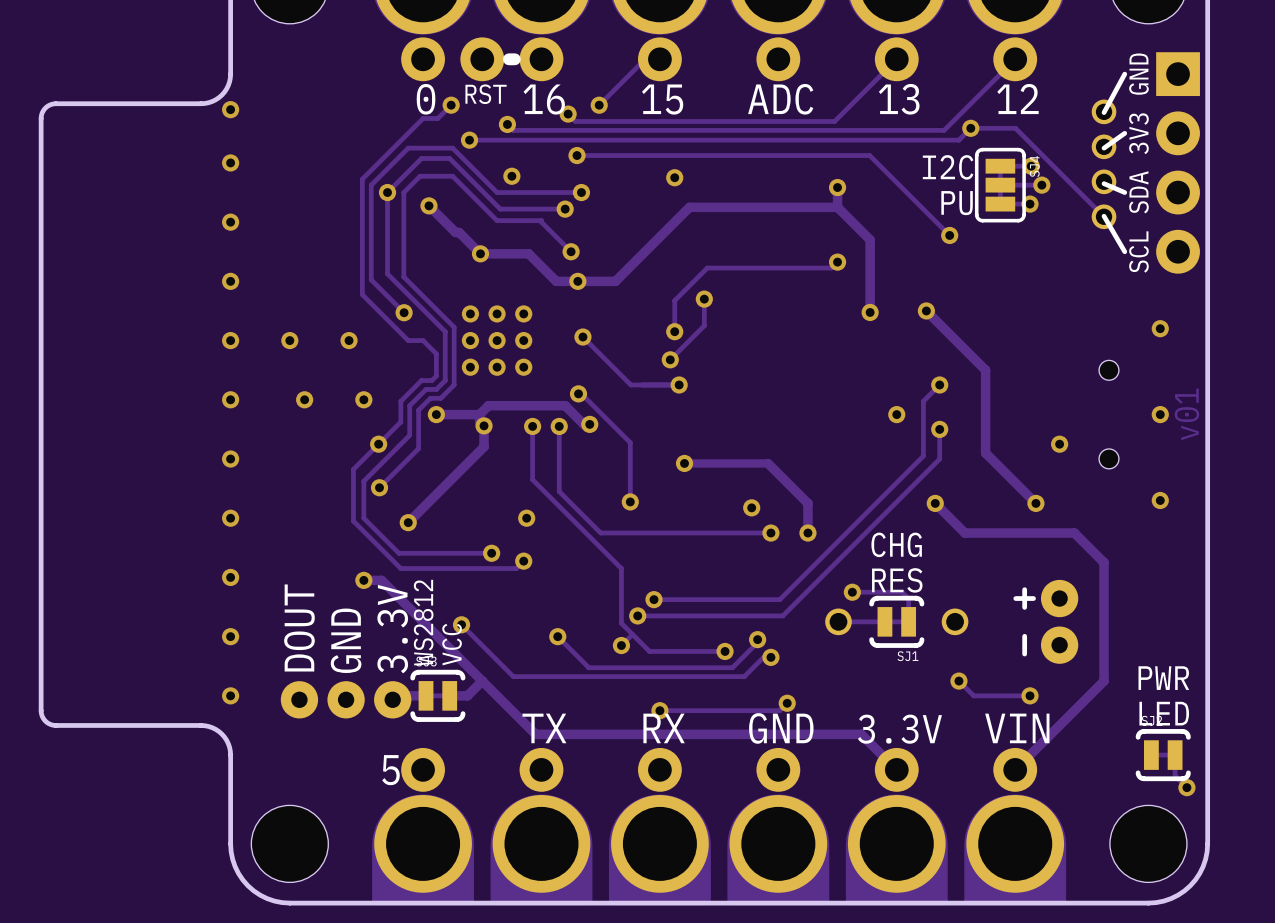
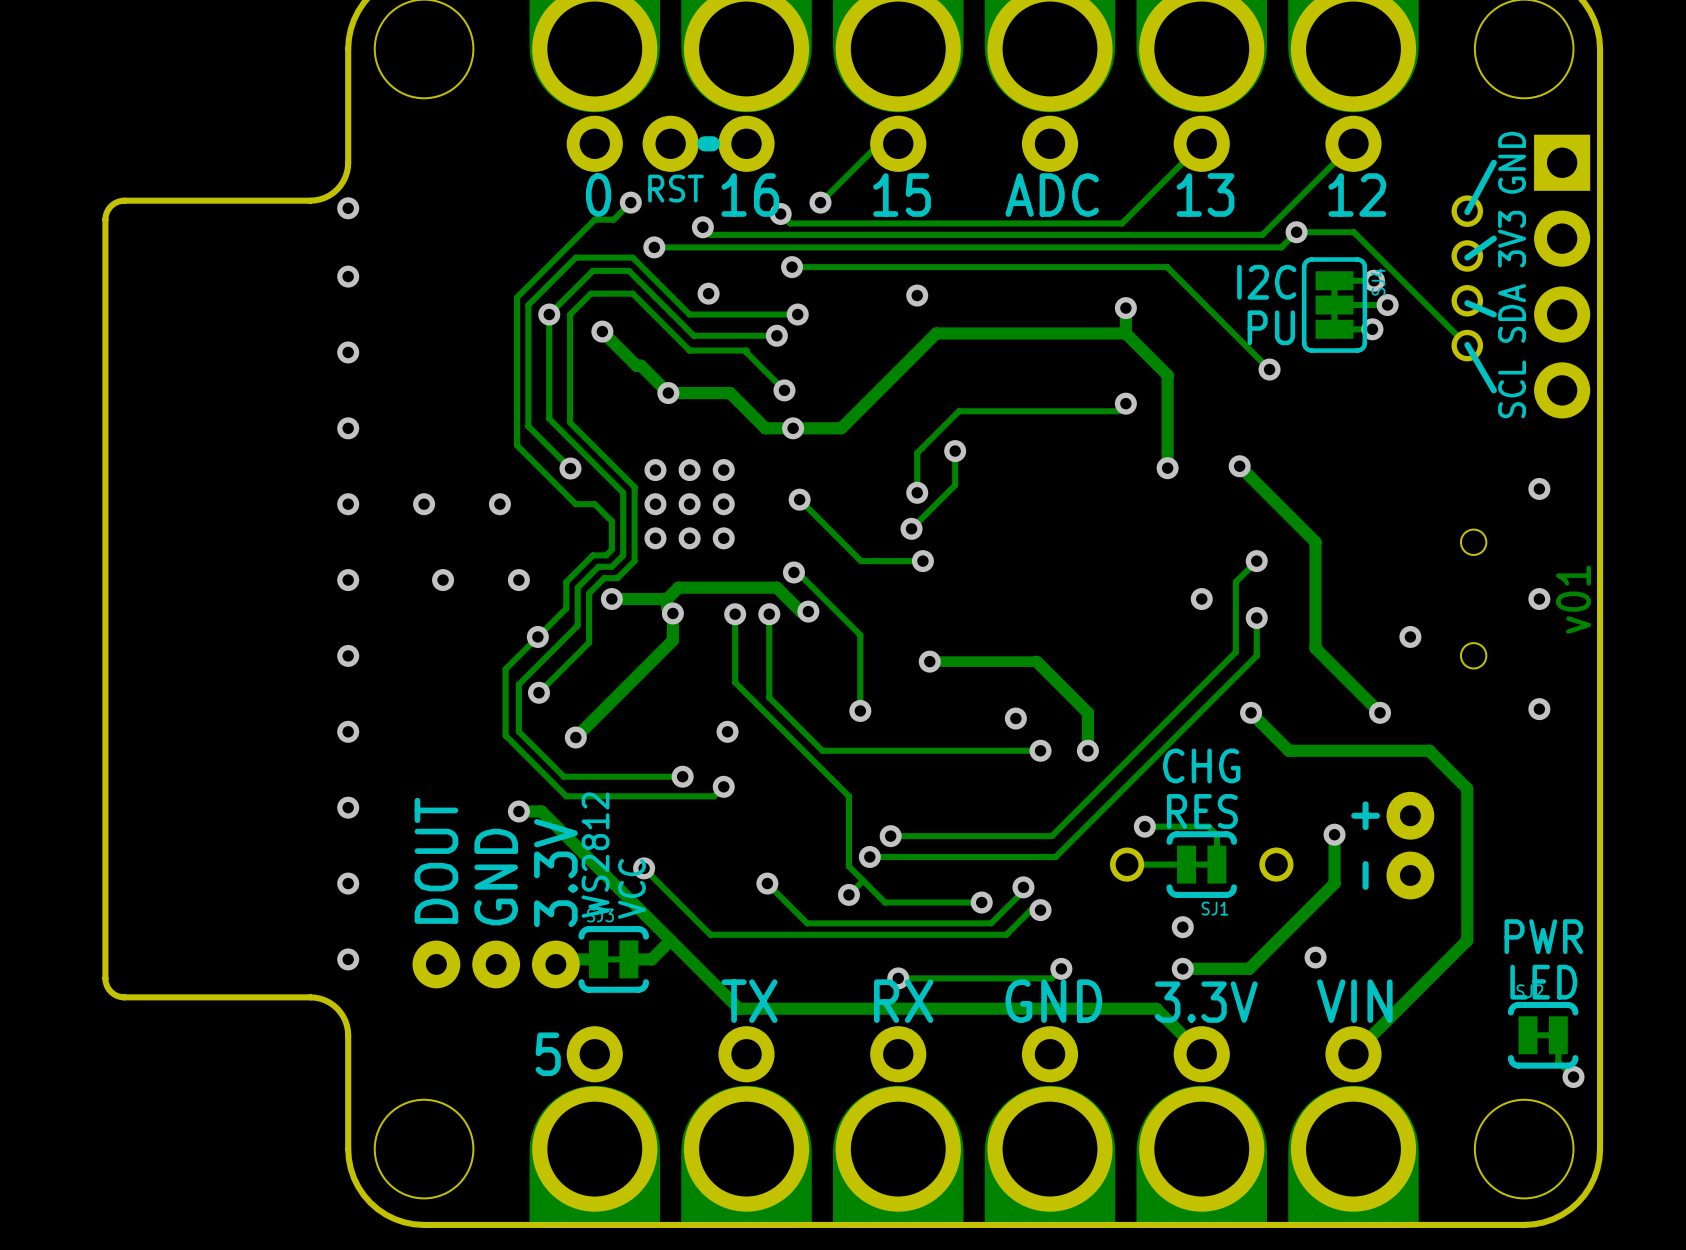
line: (1024, 592) (1024, 607) -> (1365, 804) (1365, 823)
track: none -> (1334, 834) (1334, 883) (1249, 968) (1182, 968)
via: none -> (1334, 834)
line: (1033, 598) (1015, 598) -> (1376, 815) (1354, 815)
part position: (1059, 621) -> (1410, 845)
line: (1024, 639) (1024, 654) -> (1365, 864) (1365, 883)
via: none -> (1182, 927)
track: (958, 681) (973, 695) (1030, 695) -> none
via: (958, 681) -> none
via: none -> (1315, 957)
via: (1030, 695) -> none
via: none -> (1182, 968)

